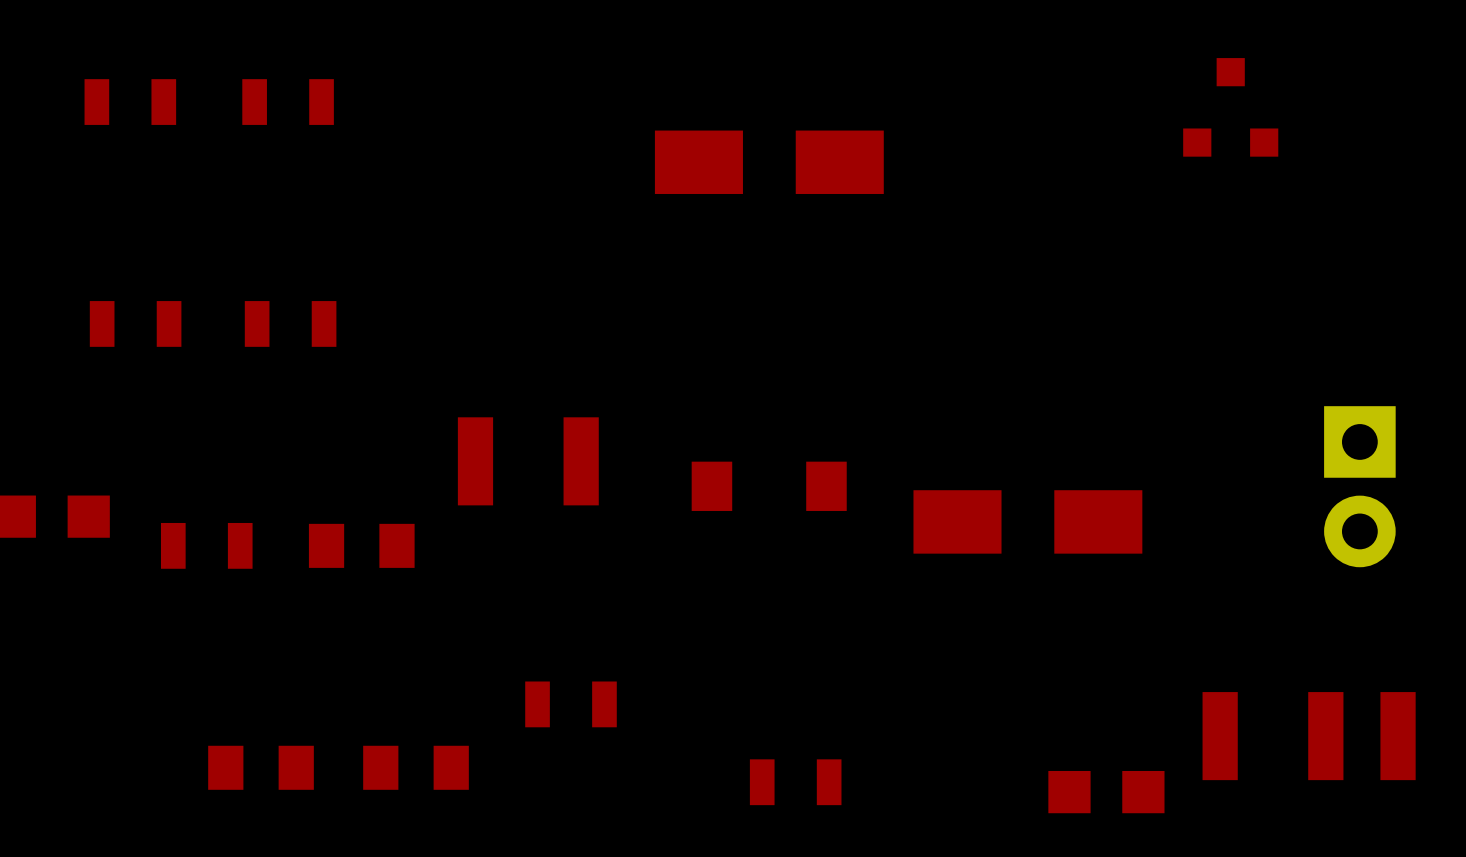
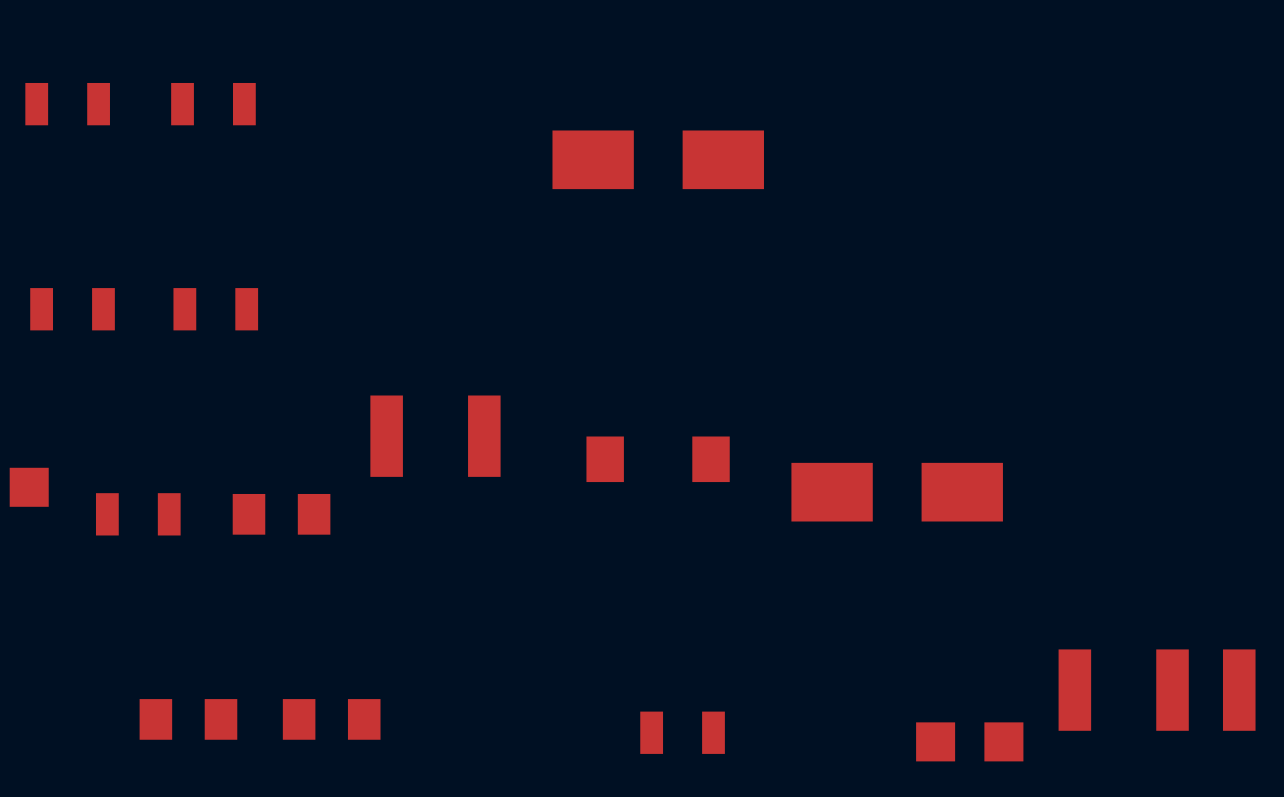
part: (1230, 107) -> none
part: (1359, 486) -> none
part: (571, 704) -> none

